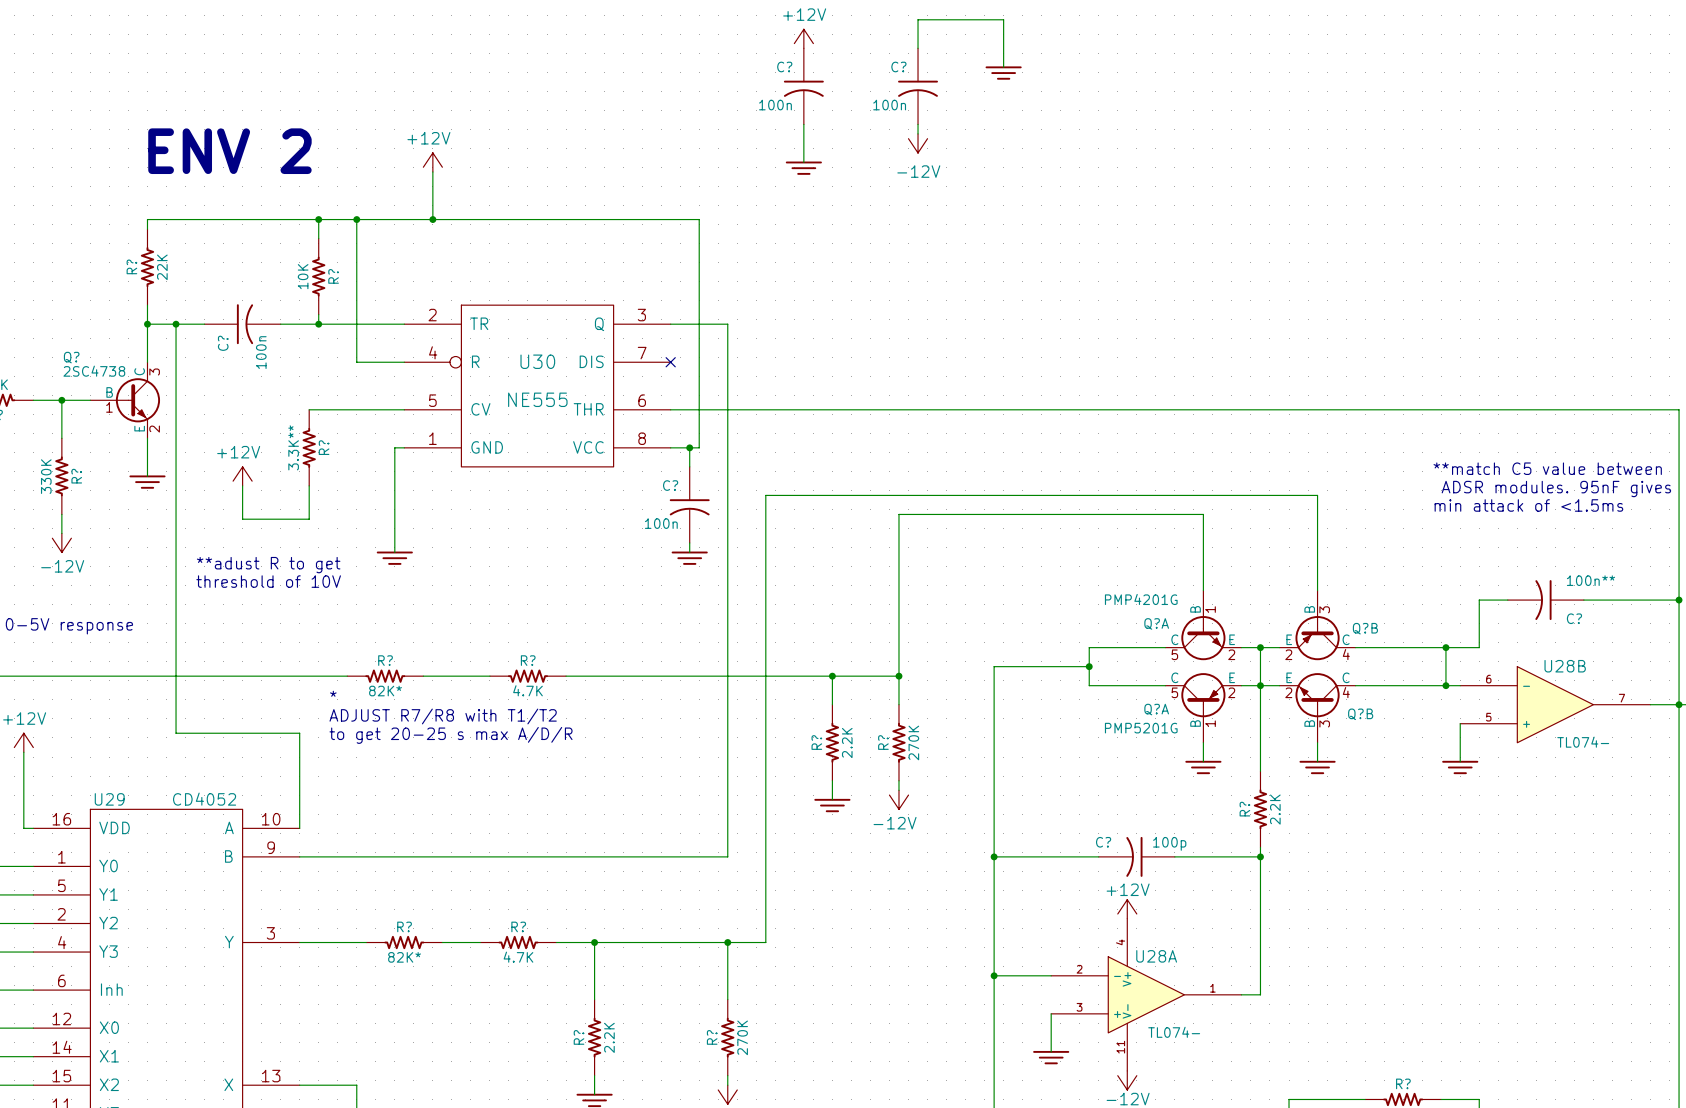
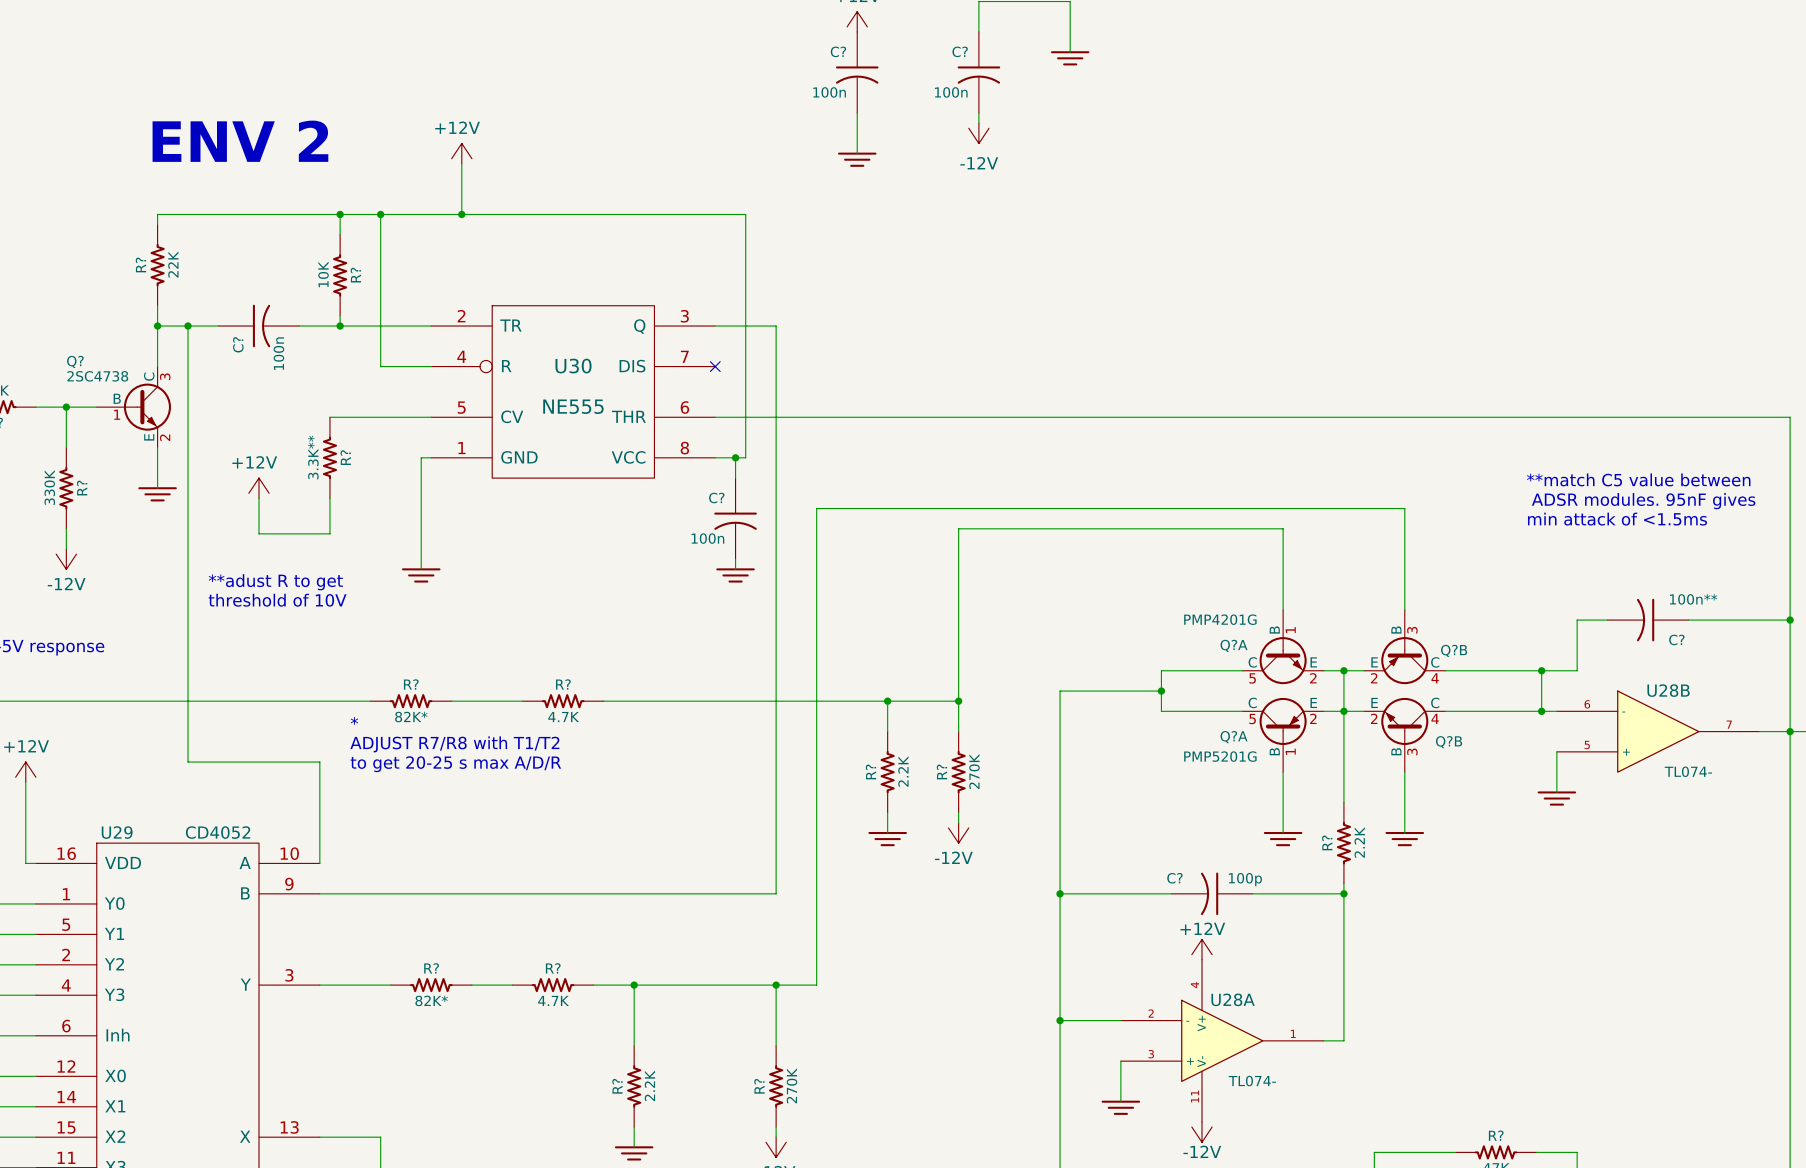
wire: none -> (1283, 792) (1283, 833)
wire: none -> (1404, 792) (1404, 833)
power symbol position: (1203, 767) -> (1283, 839)
power symbol position: (1317, 767) -> (1404, 839)

